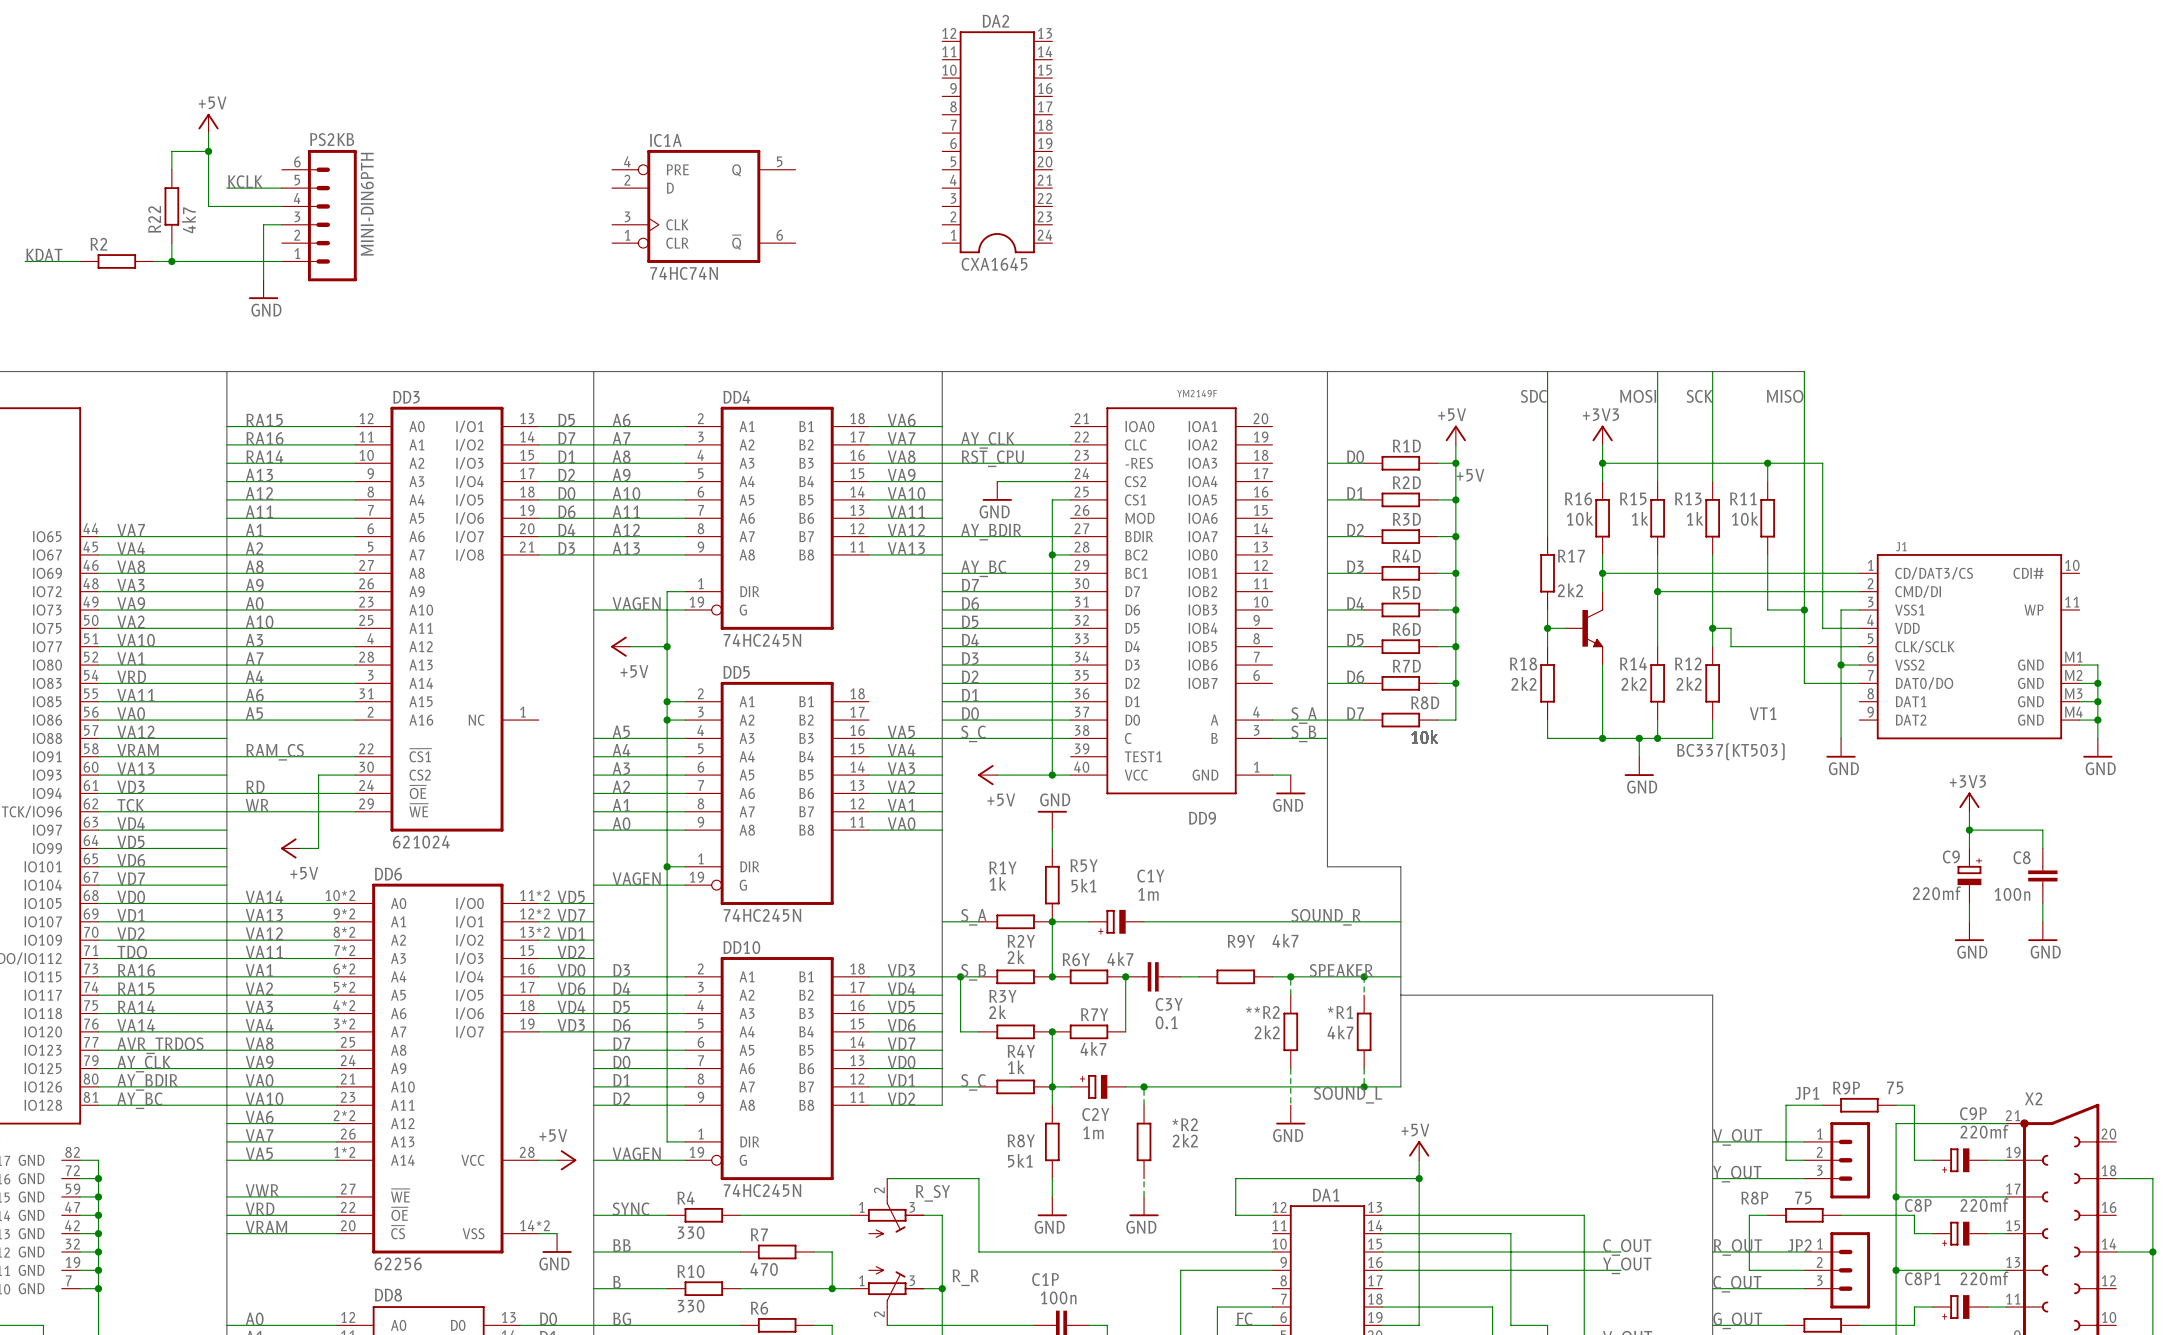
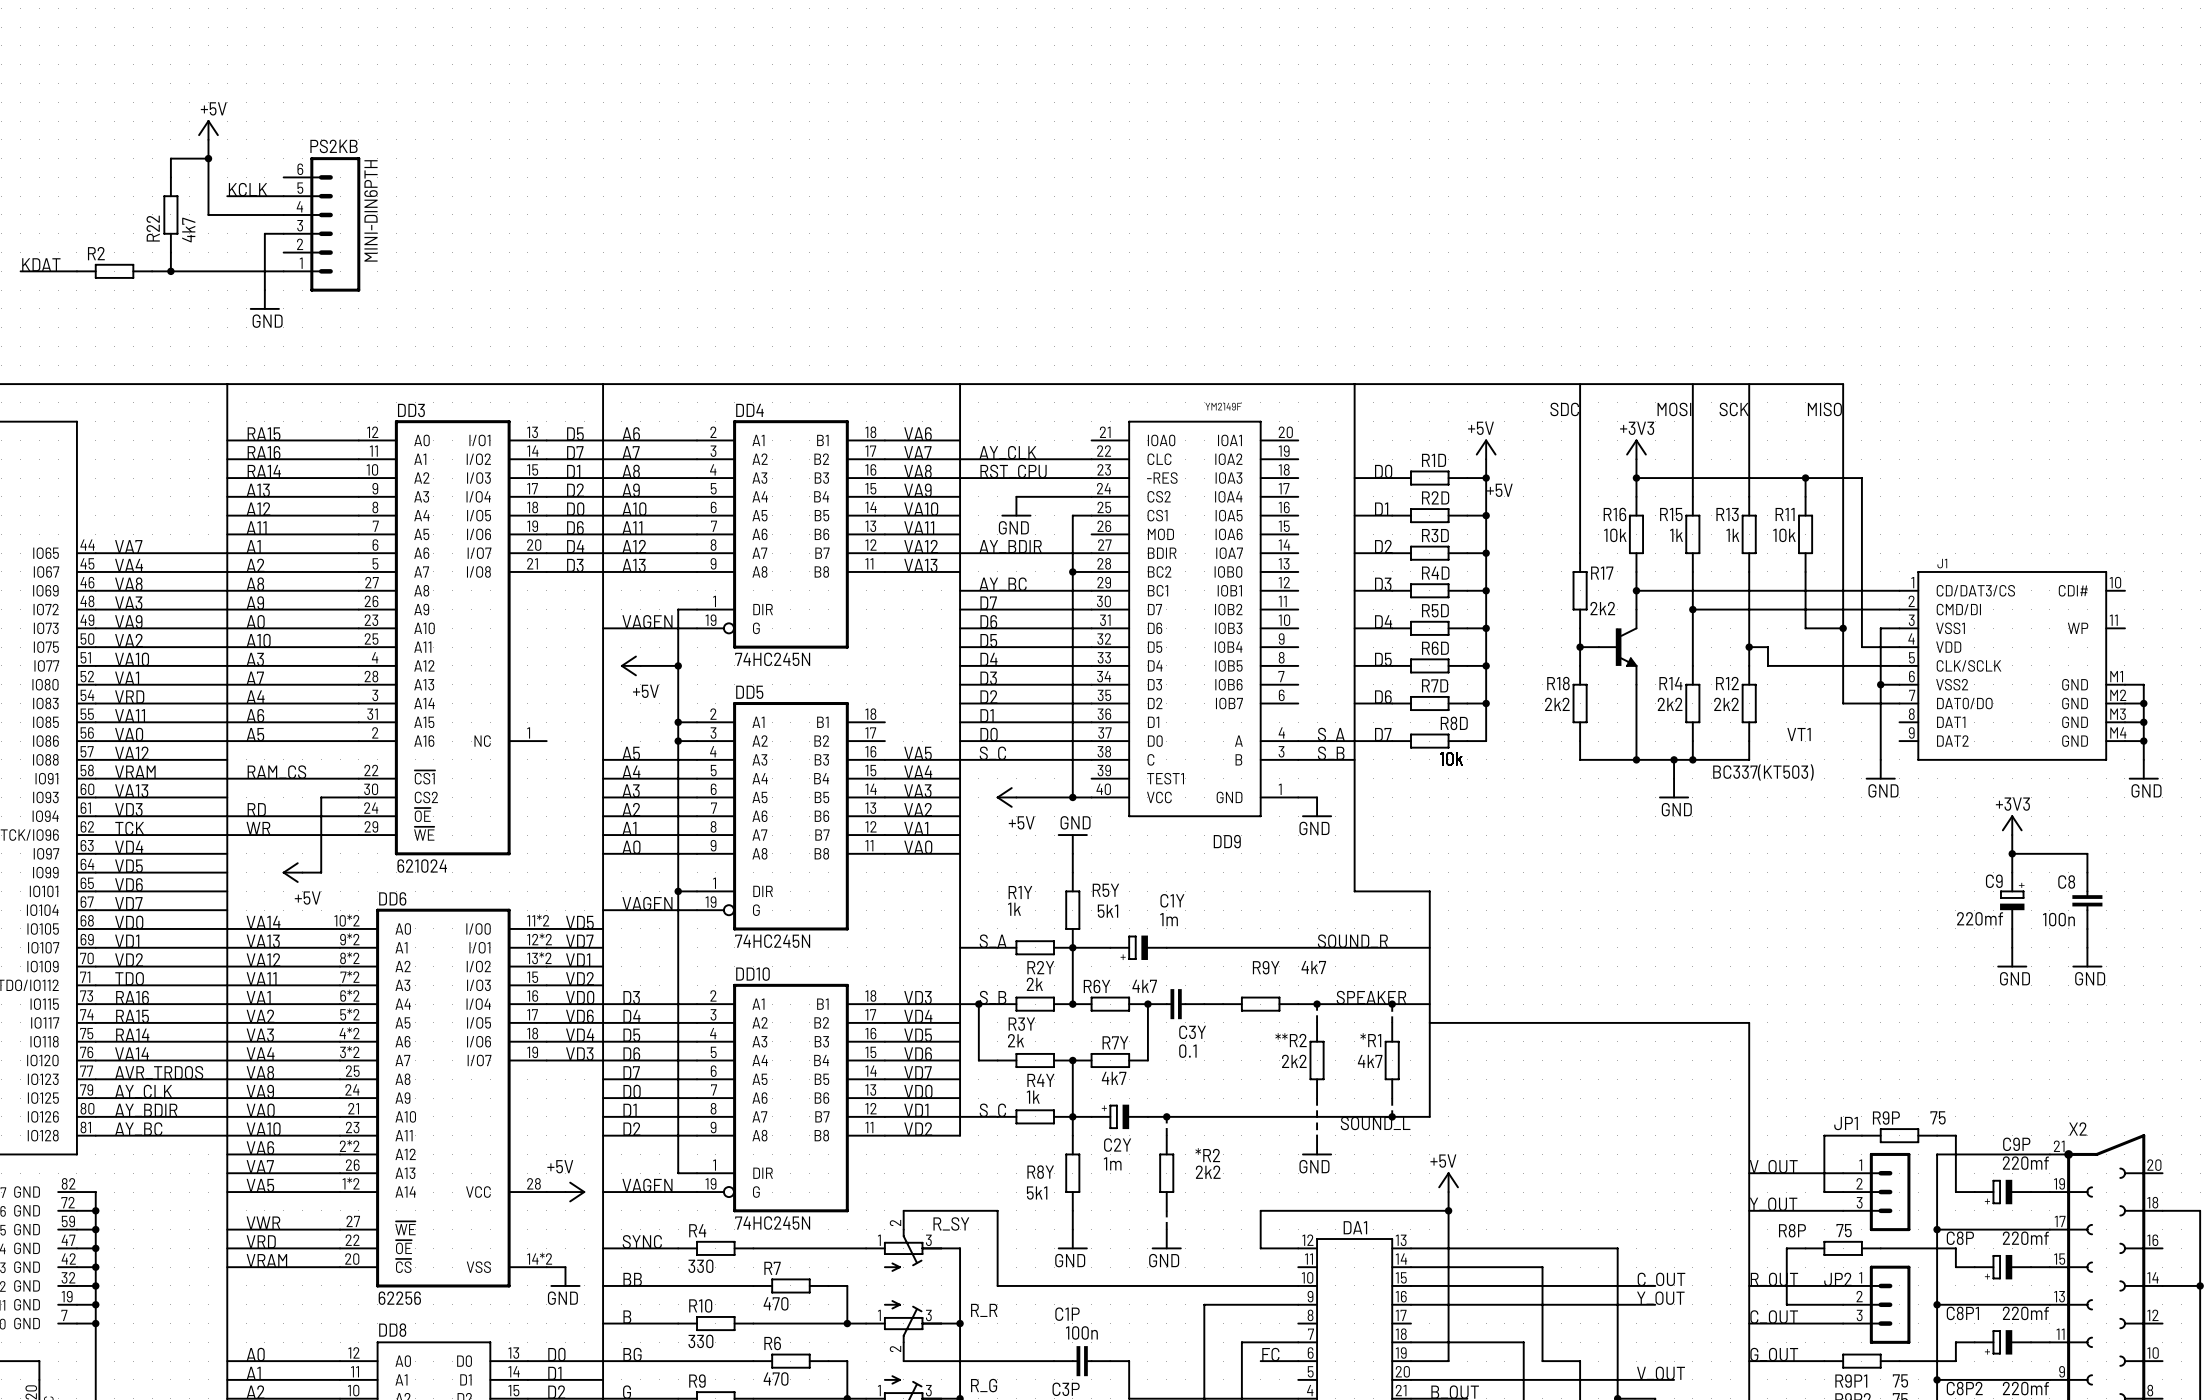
DA2: CXA1645 (997, 142) -> none
IC1A: 74HC74N (703, 206) -> none

